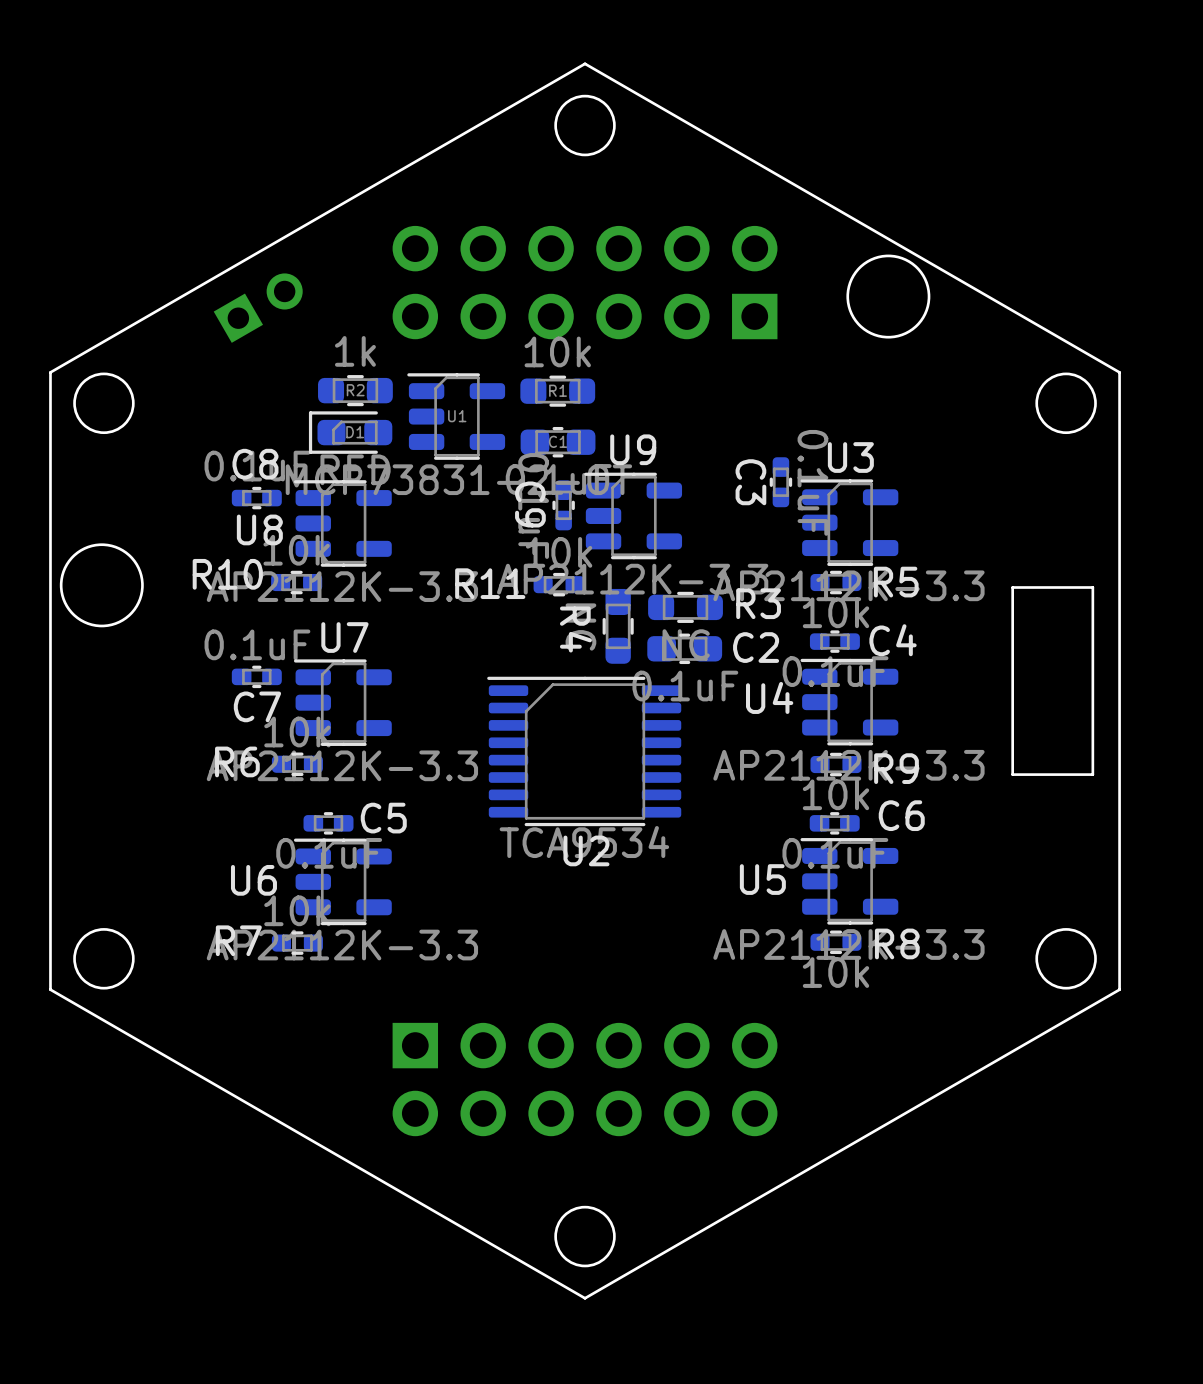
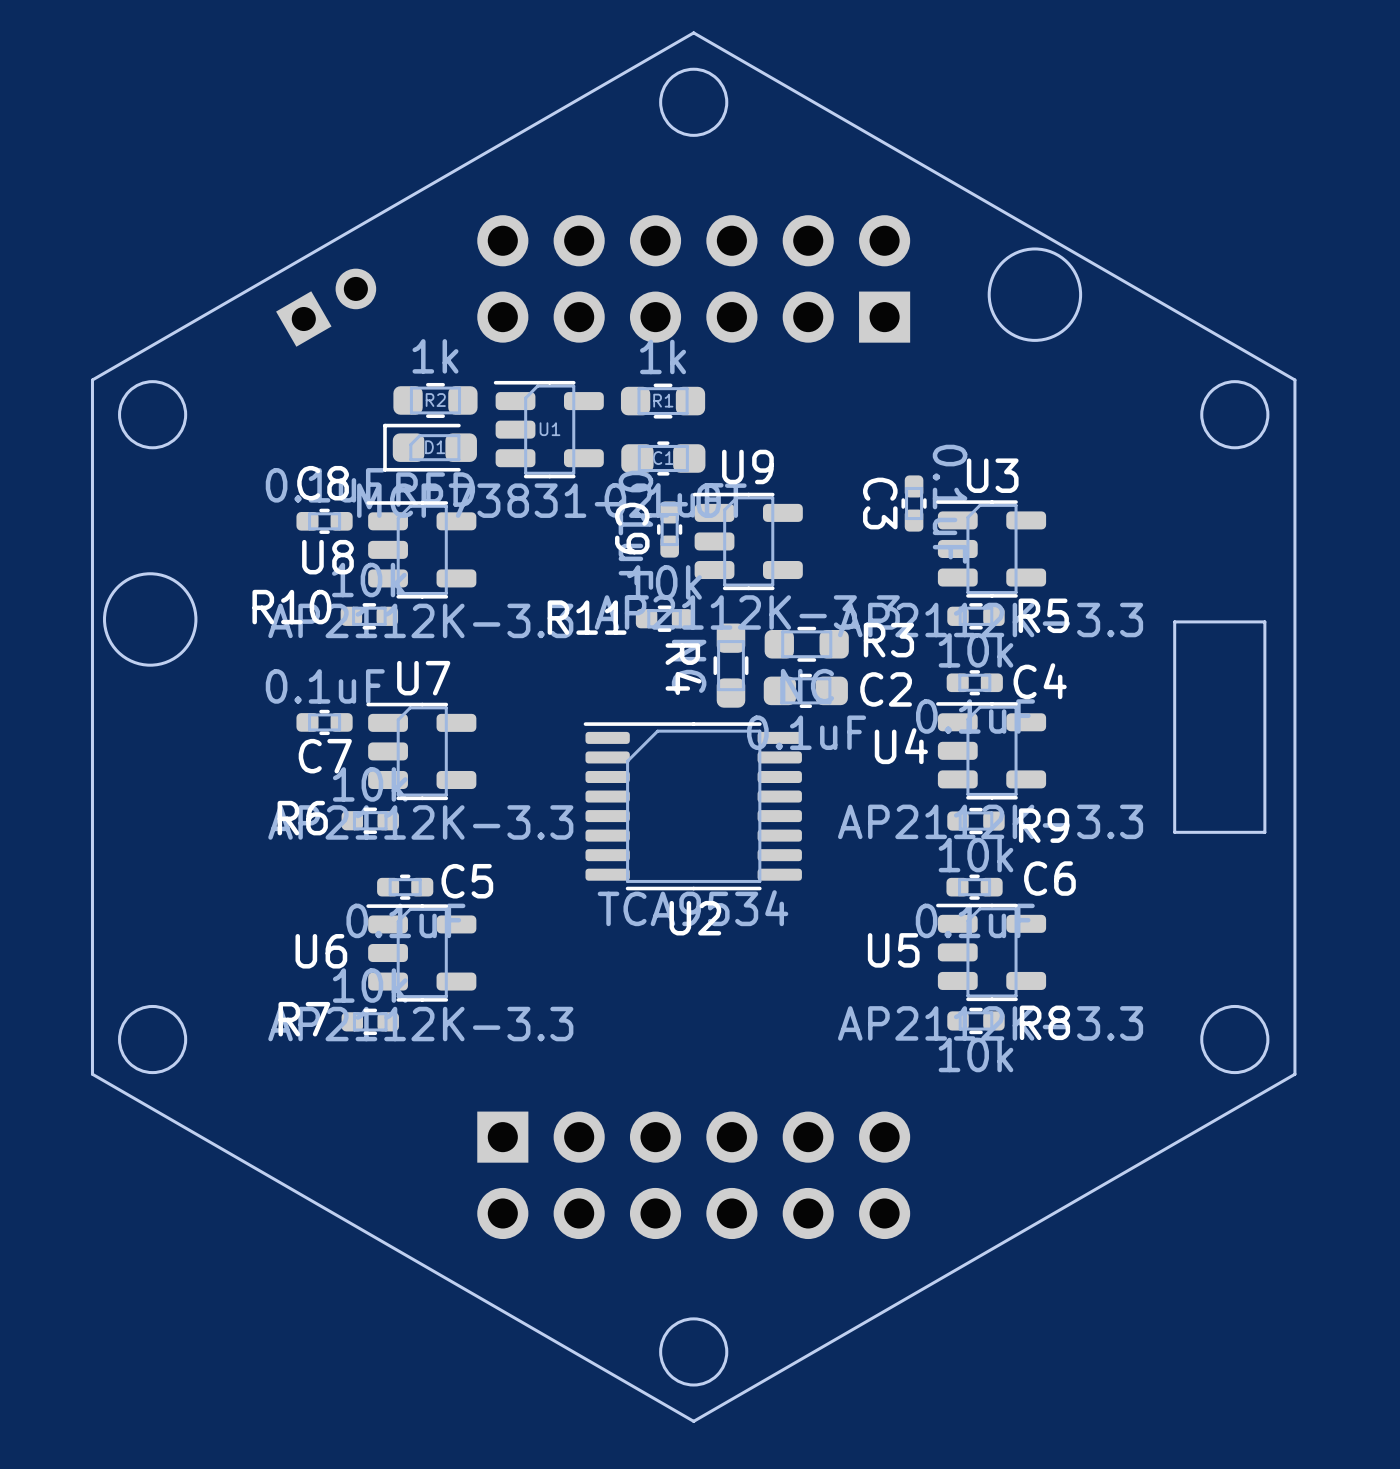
R1 value: 10k (557, 351) -> 1k (663, 356)

